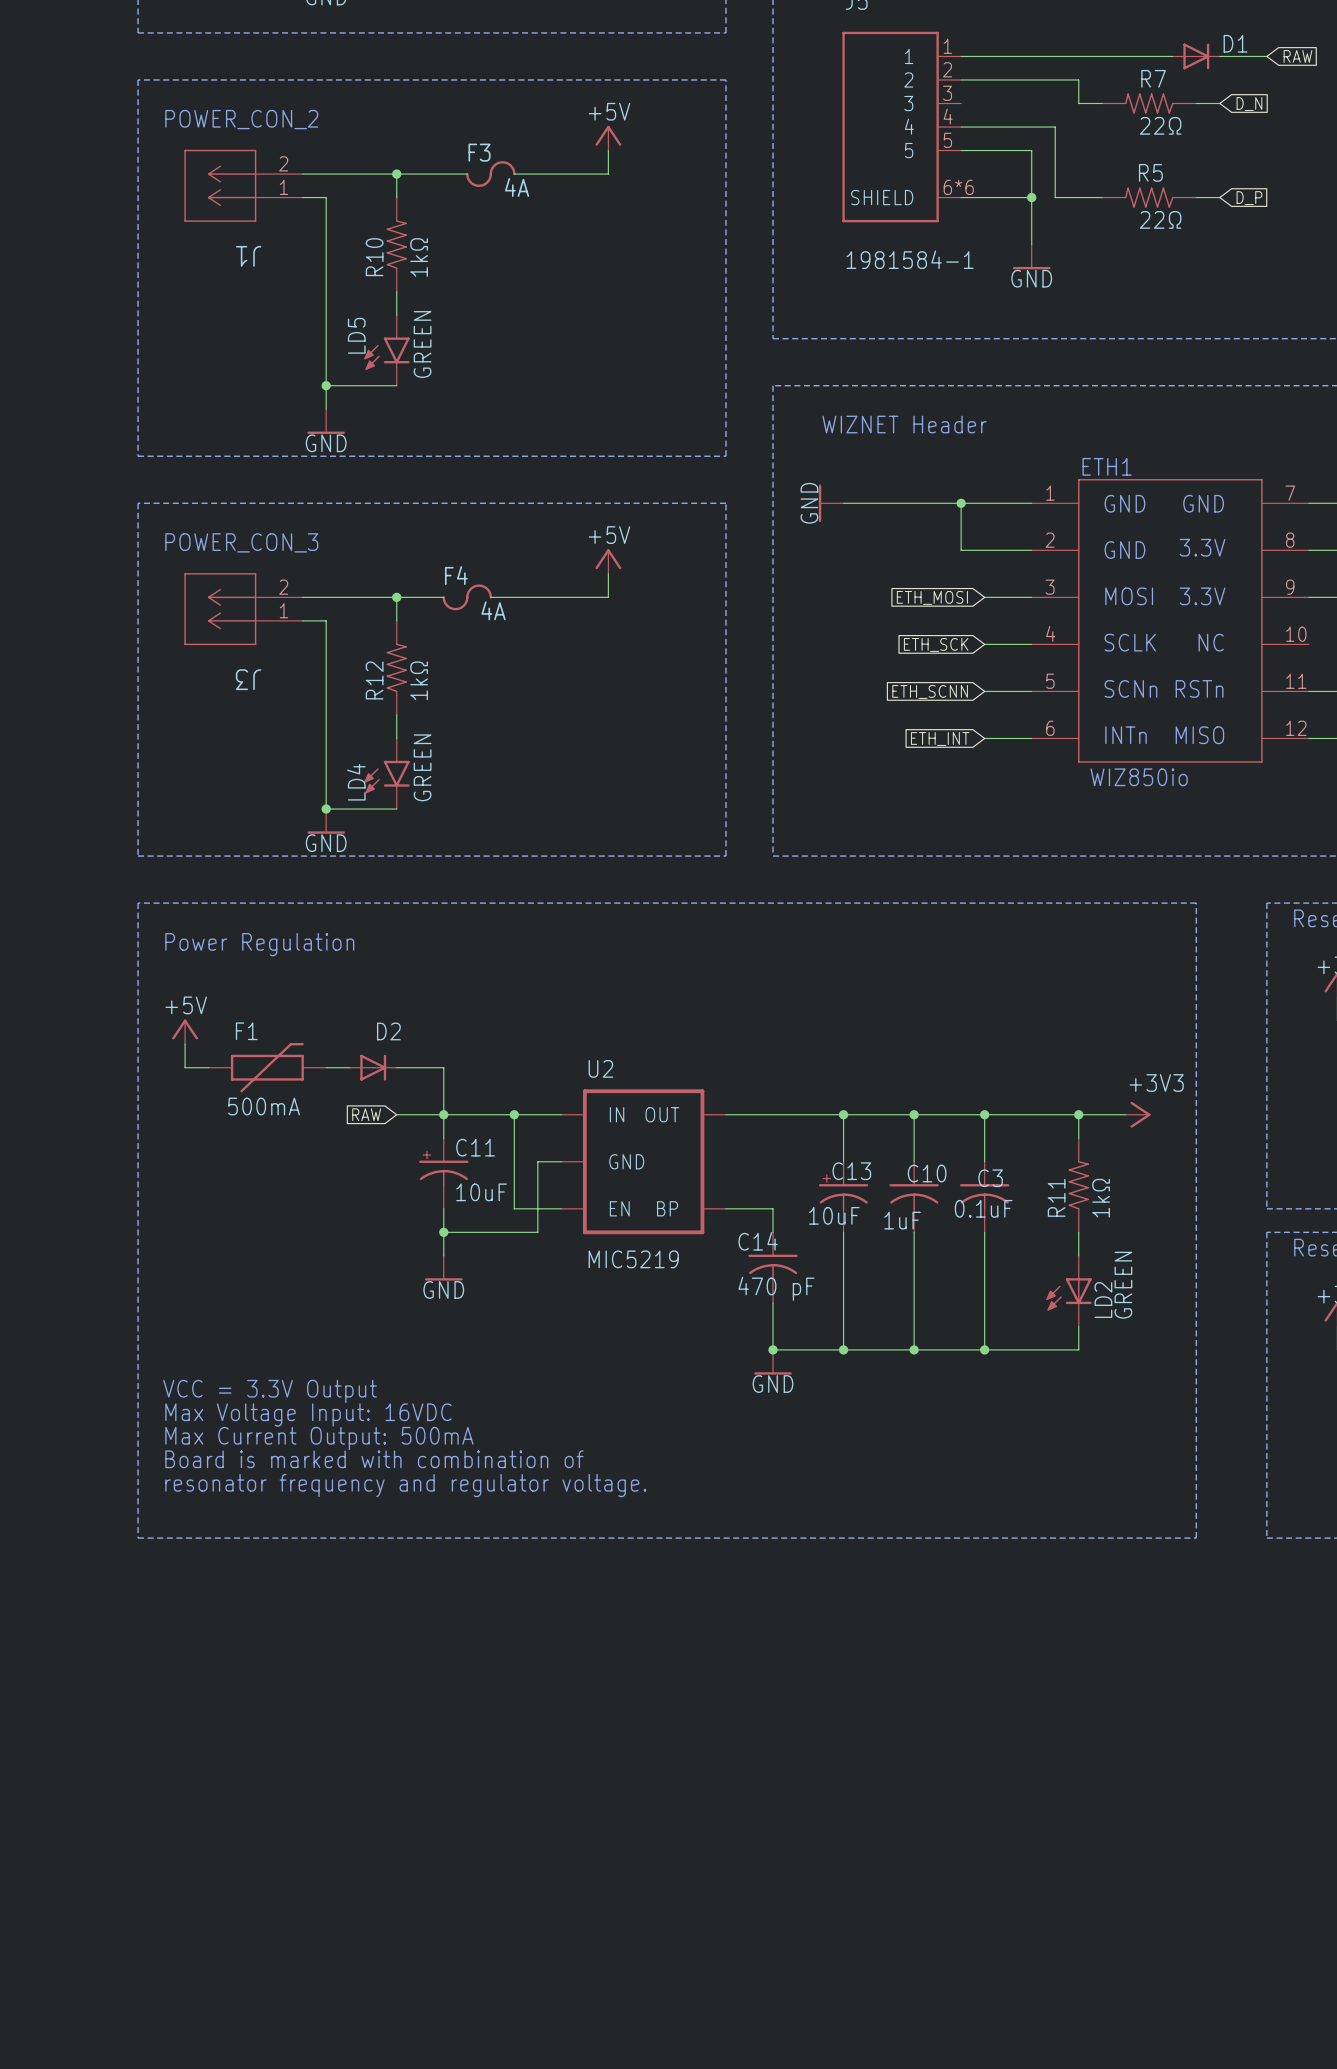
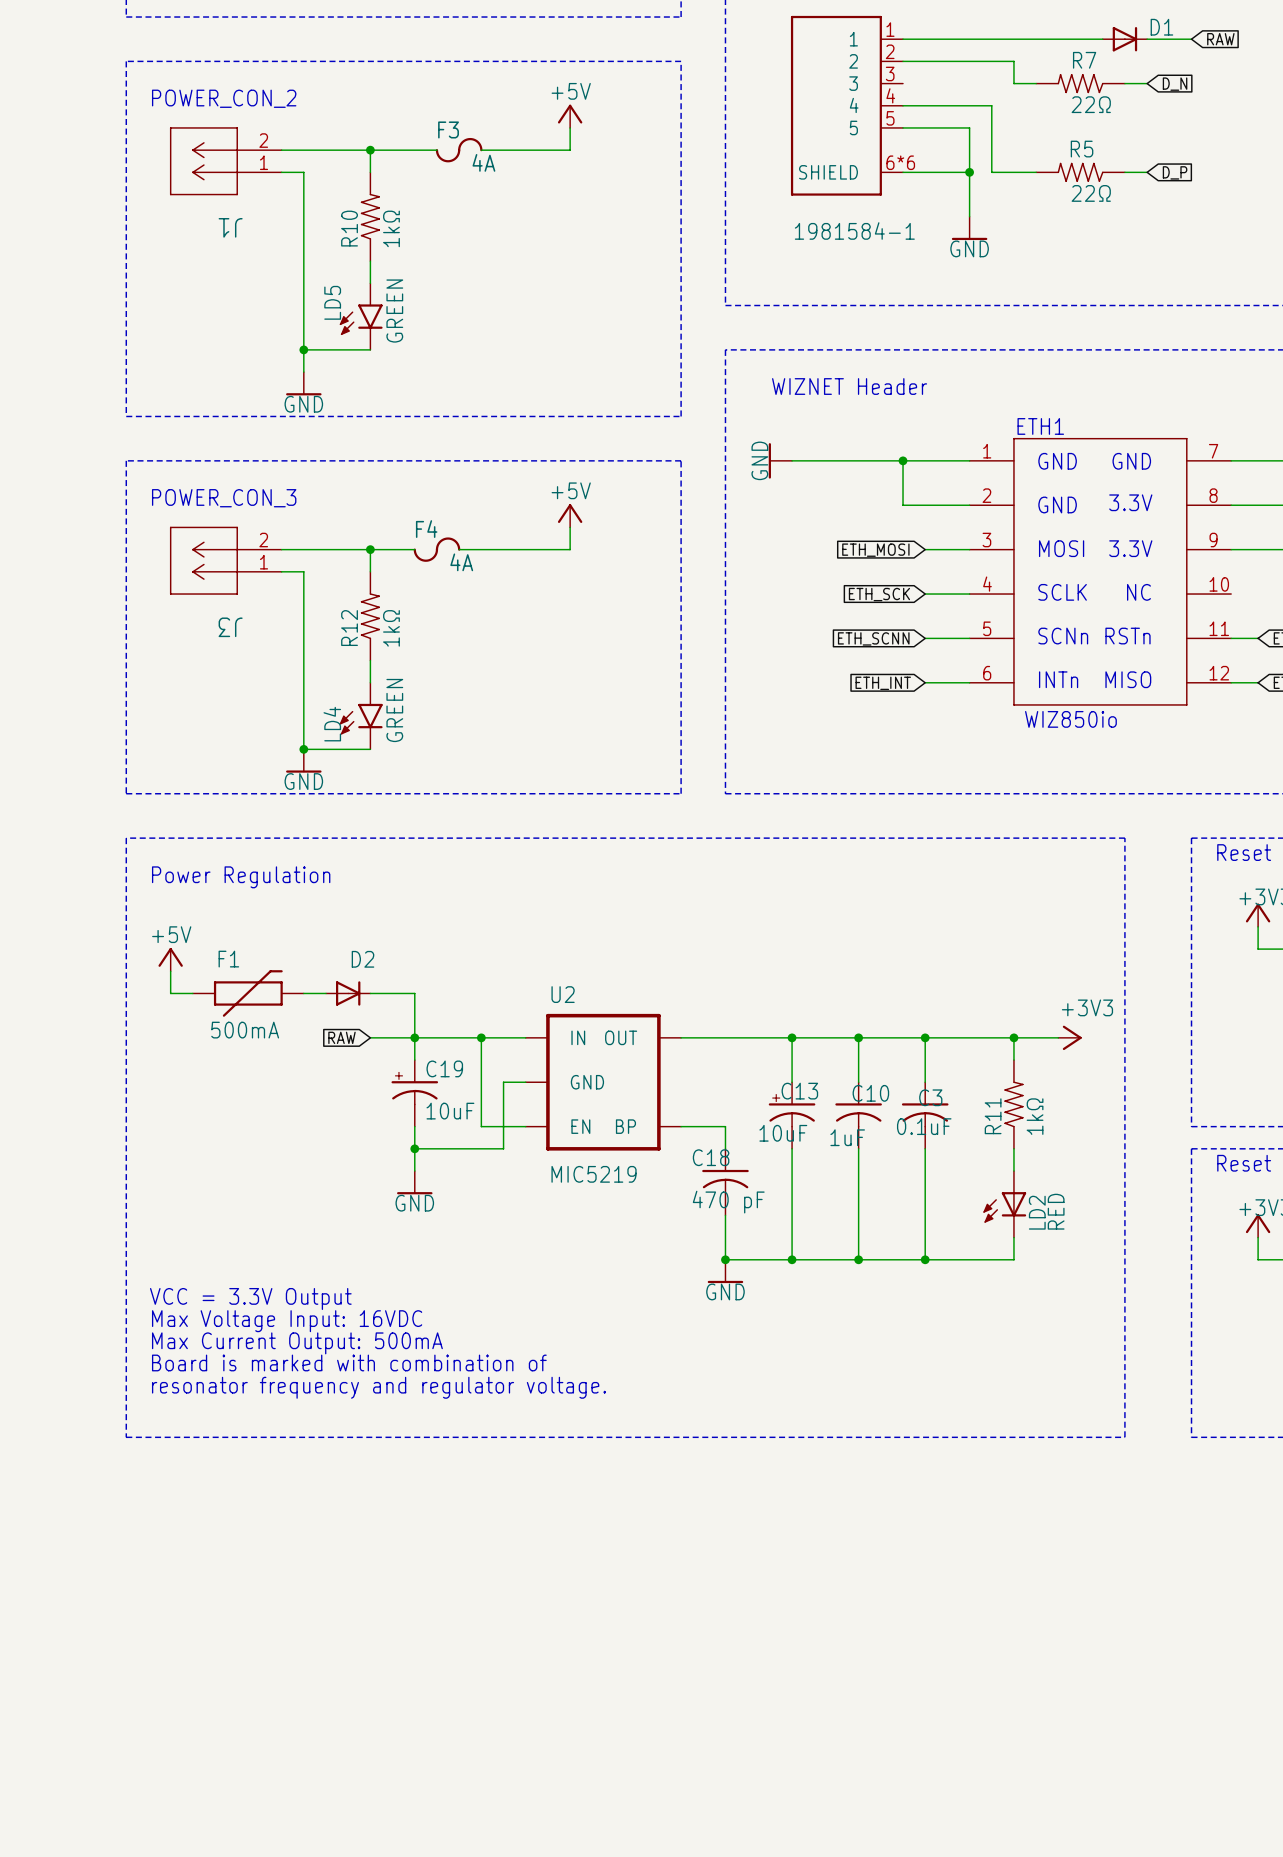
C11 name: C11 (475, 1147) -> C19 (444, 1068)
C14 name: C14 (758, 1241) -> C18 (711, 1157)
LD2 value: GREEN (1123, 1285) -> RED (1056, 1211)

